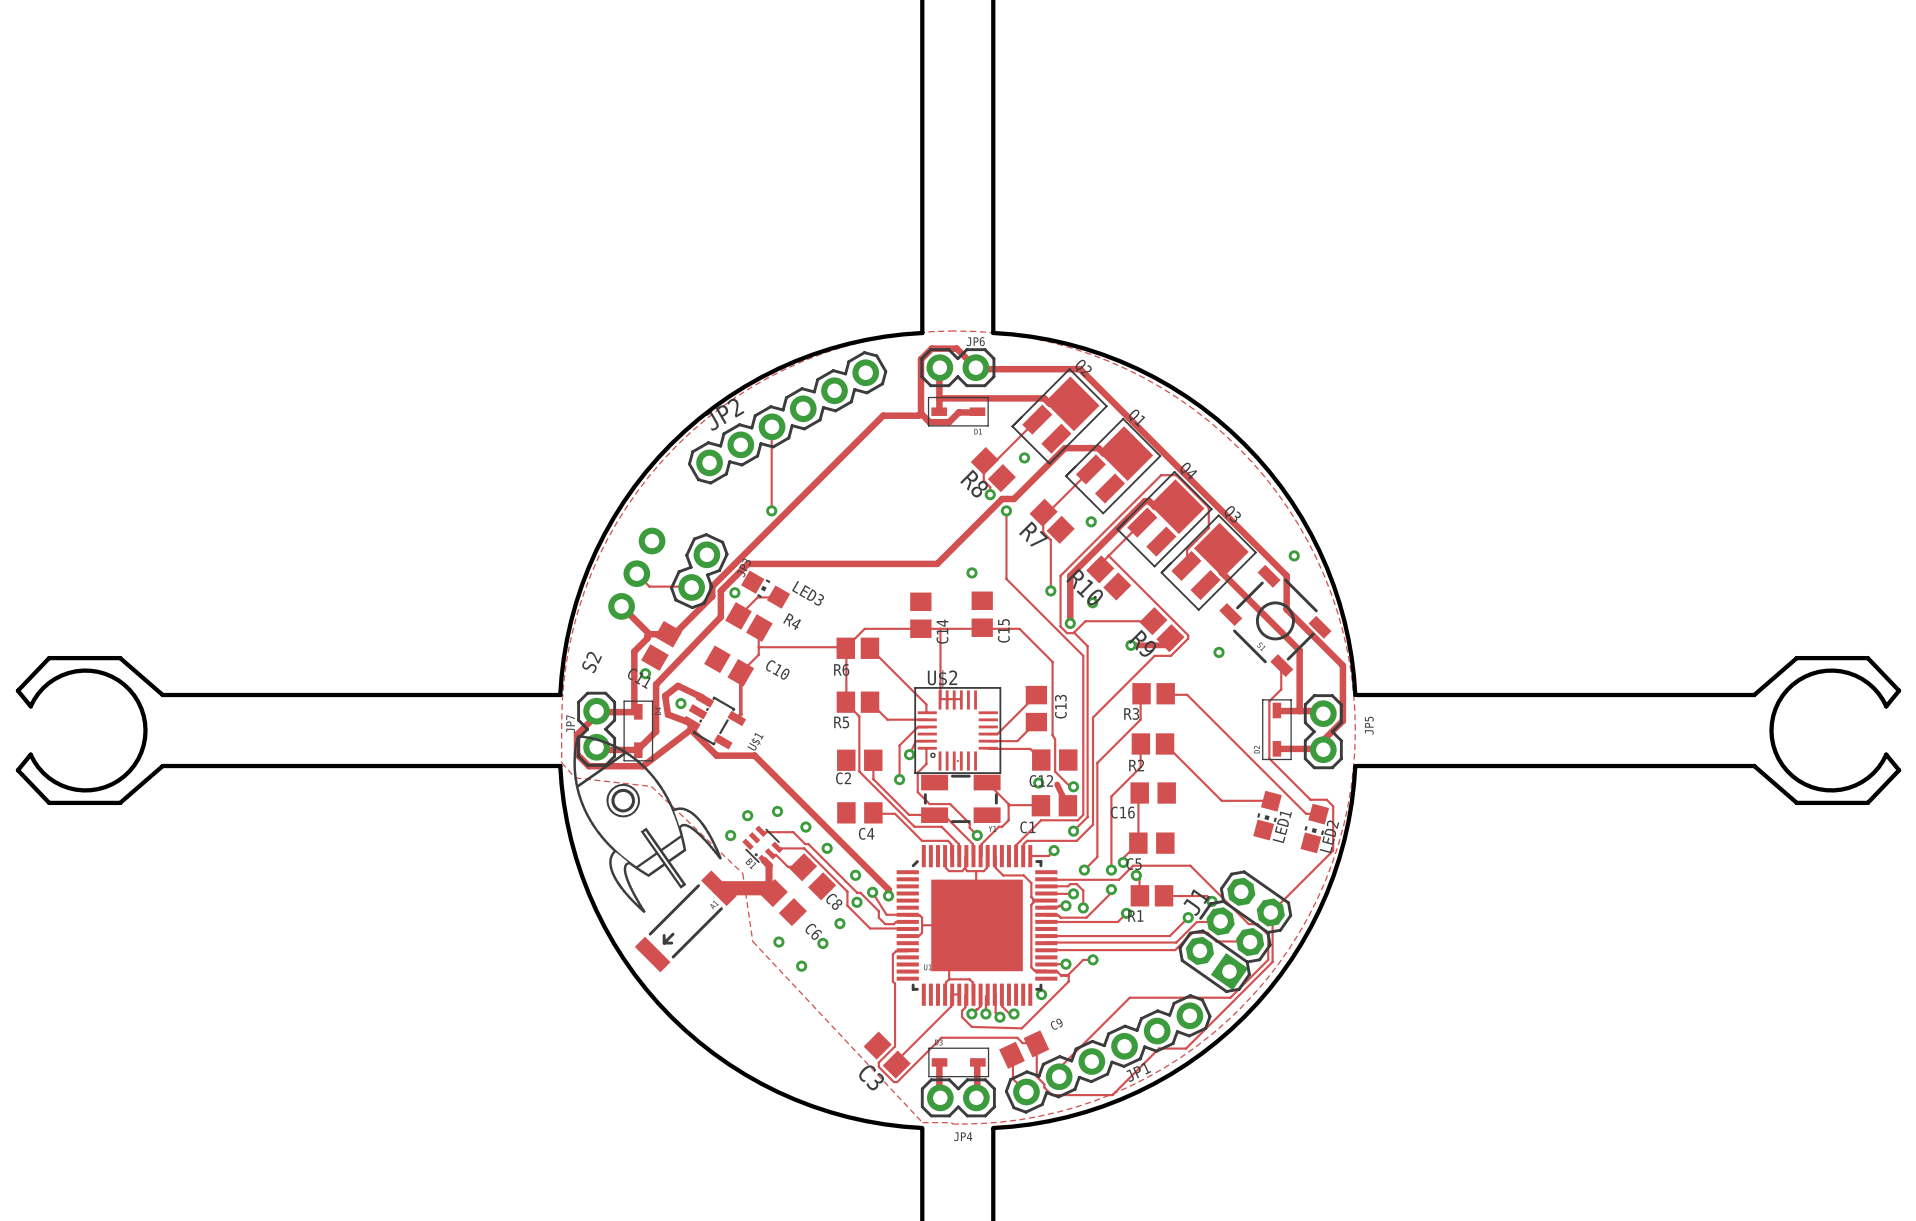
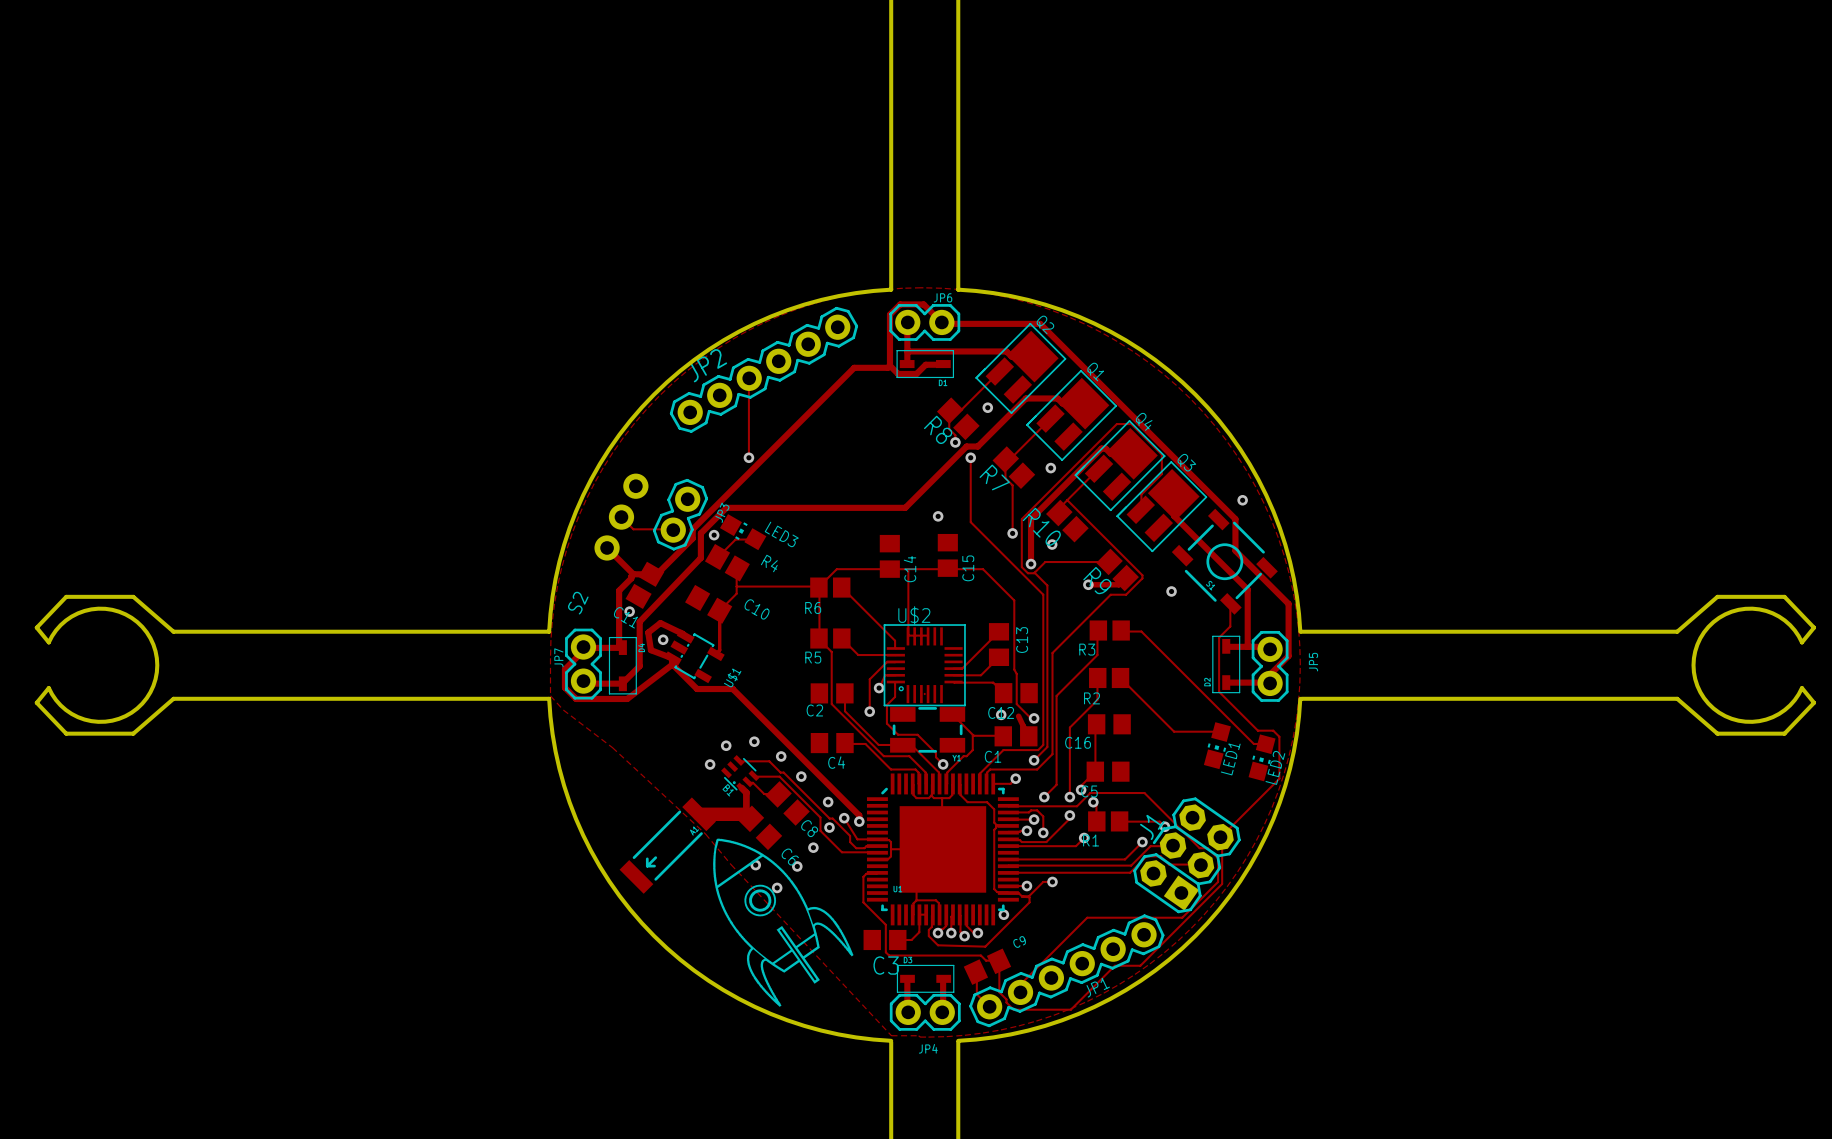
zone outline: (575, 777) (651, 786) (742, 873) (752, 941) -> (563, 710) (612, 747) (705, 833) (731, 864)
drawing position: (647, 824) -> (783, 922)
track: (895, 983) (895, 1046) (878, 1062) (878, 1066) (893, 1082) (897, 1082) (941, 1037) -> (865, 904) (885, 924) (885, 952) (889, 955) (909, 955)
track: (952, 994) (951, 1006) (897, 1060) (896, 1064) -> (919, 914) (919, 932) (911, 939) (897, 939)
C3 rotation: 0° (887, 1055) -> 45° counterclockwise (885, 939)
C3 position: (887, 1055) -> (885, 939)

